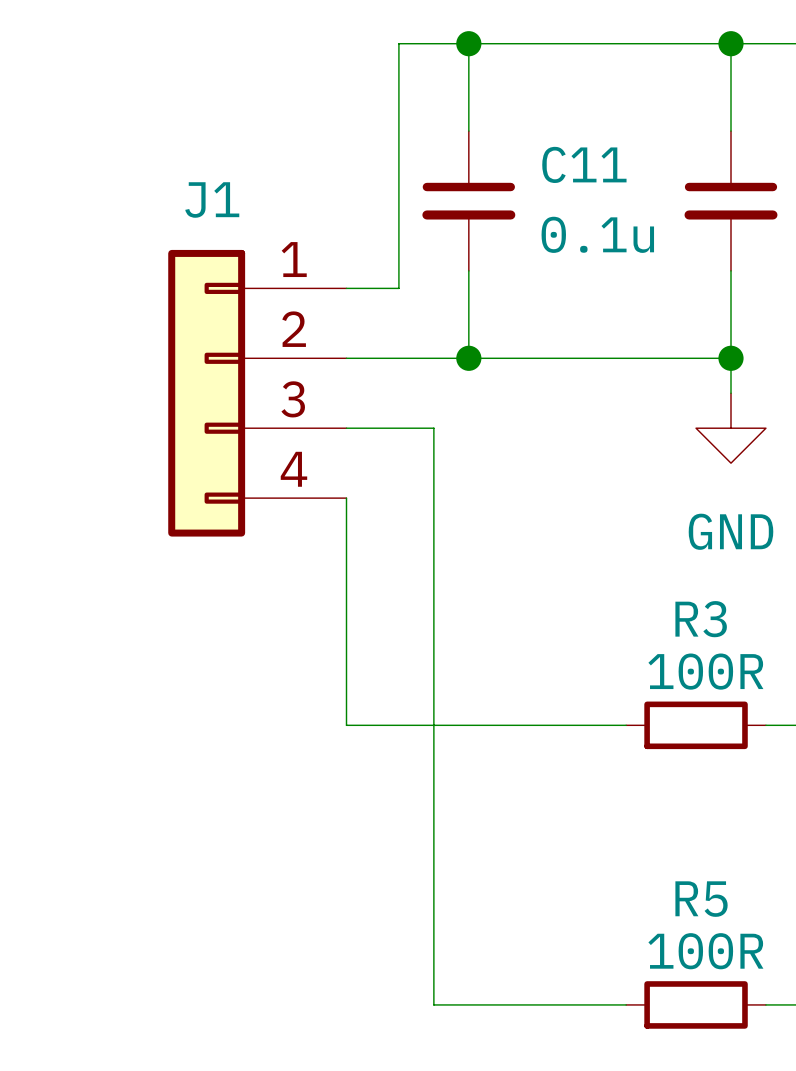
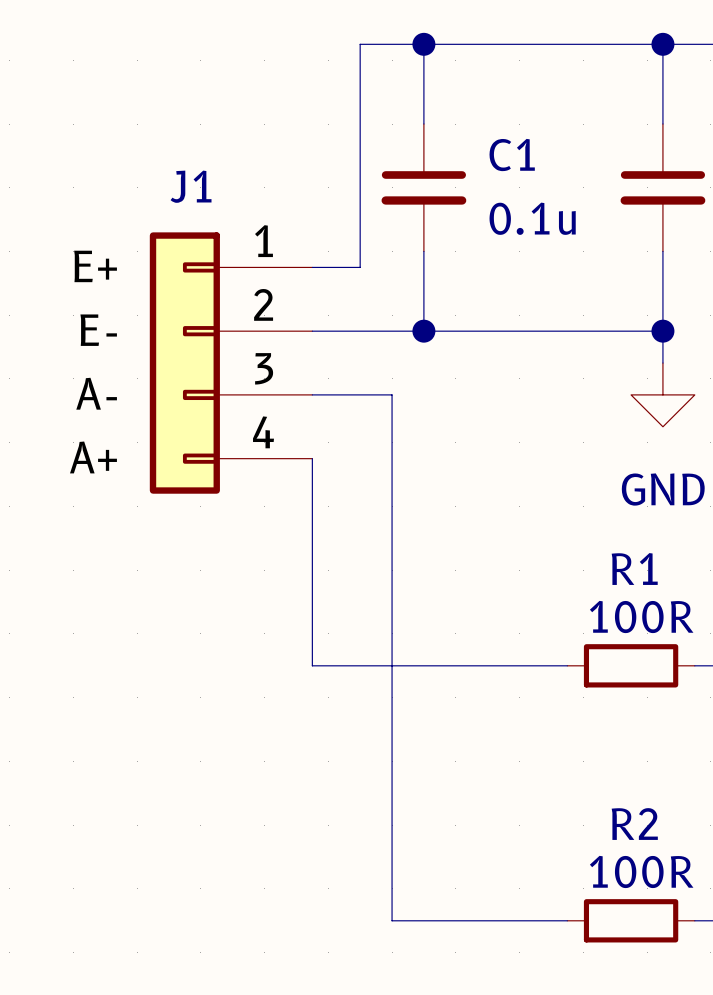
C11 name: C11 (584, 164) -> C1 (512, 155)
J1 pin name: none -> E+ (95, 266)
J1 pin name: none -> E- (98, 330)
J1 pin name: none -> A- (96, 393)
J1 pin name: none -> A+ (93, 457)
R3 name: R3 (701, 619) -> R1 (634, 569)
R5 name: R5 (701, 899) -> R2 (634, 824)

